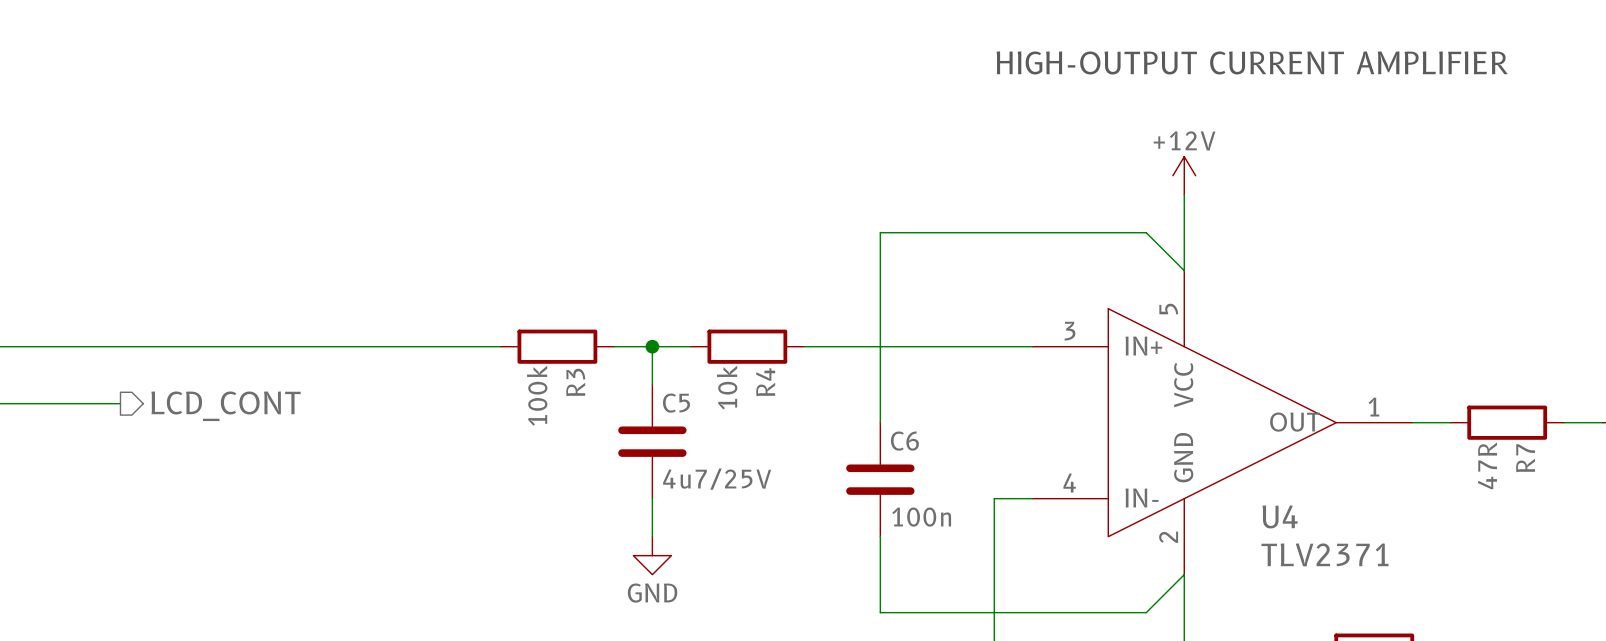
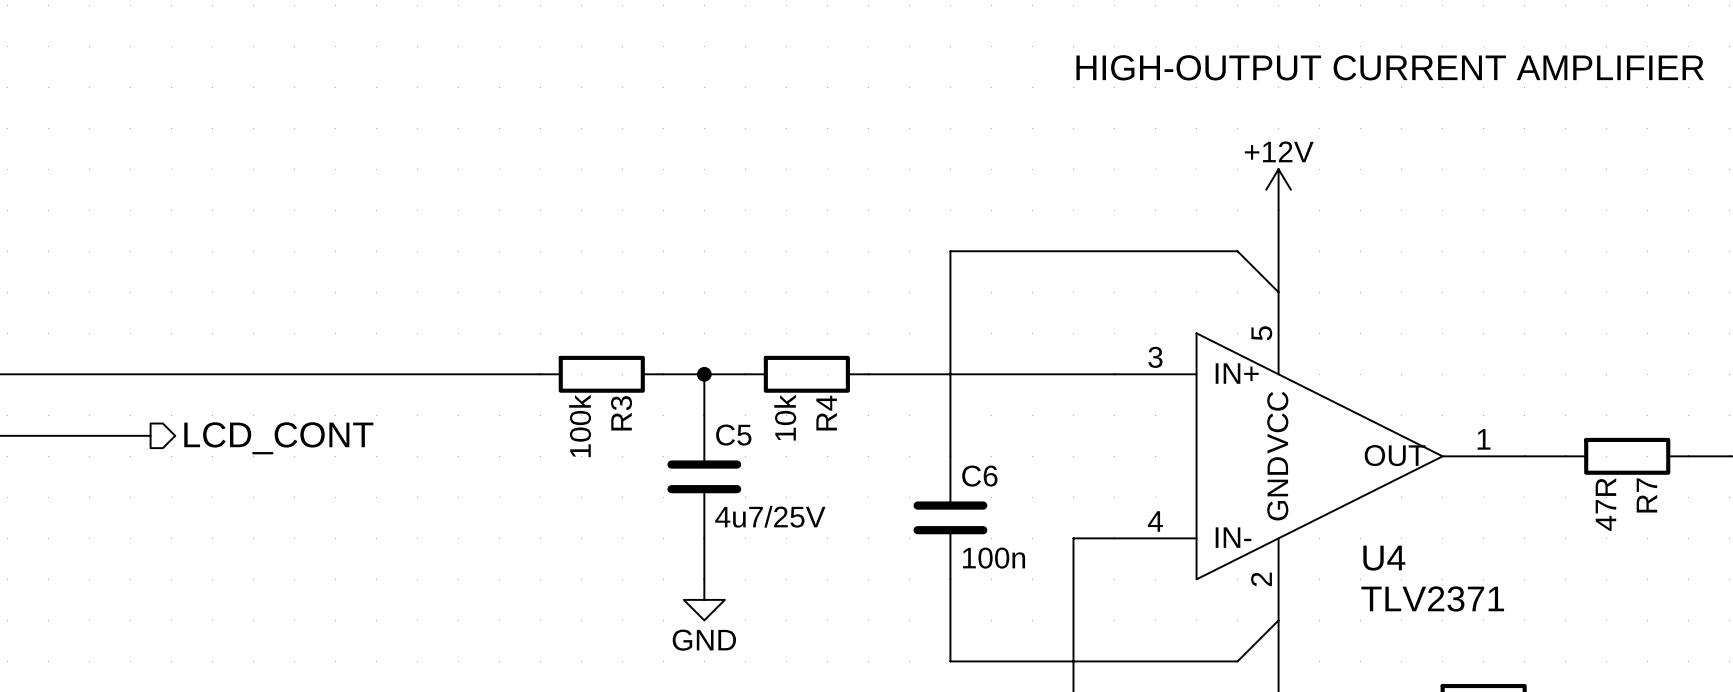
wire: none -> (130, 435) (150, 435)
hierarchical label position: LCD_CONT (226, 406) -> LCD_CONT (278, 438)

